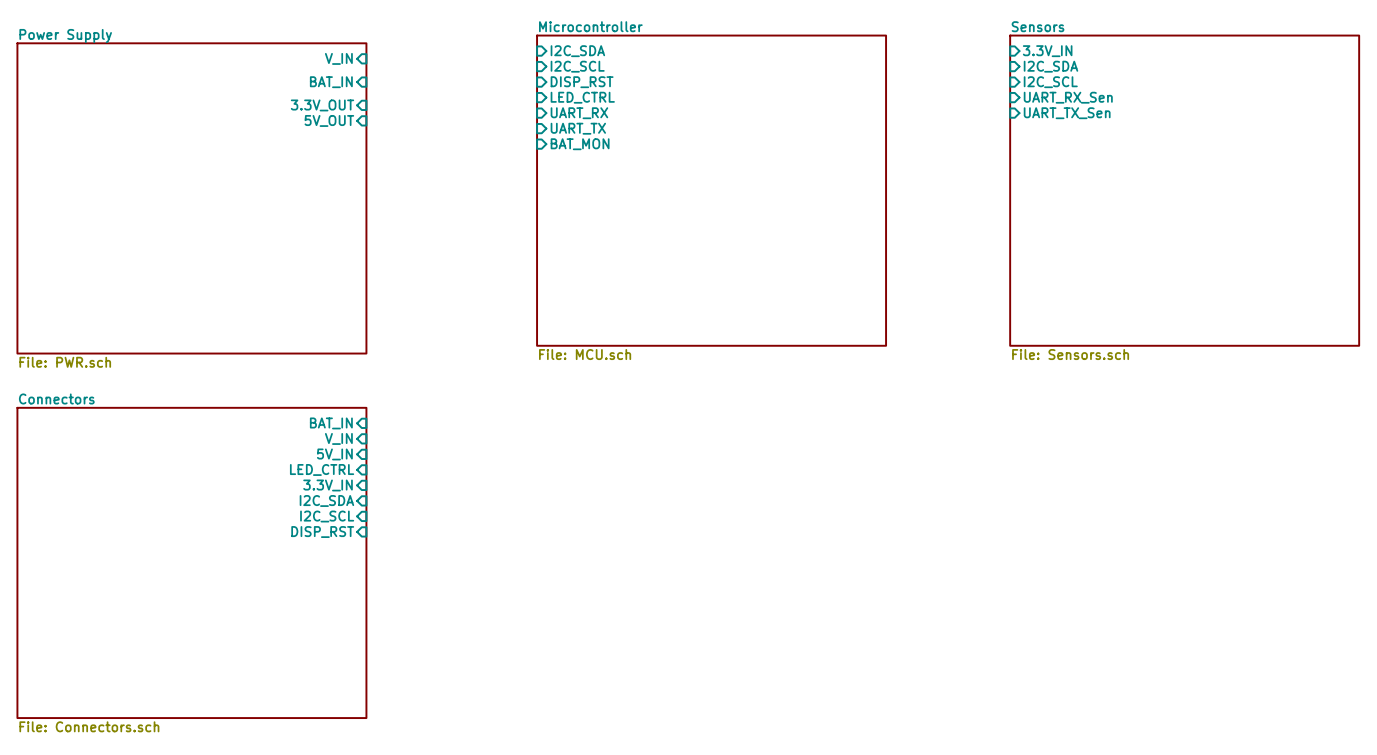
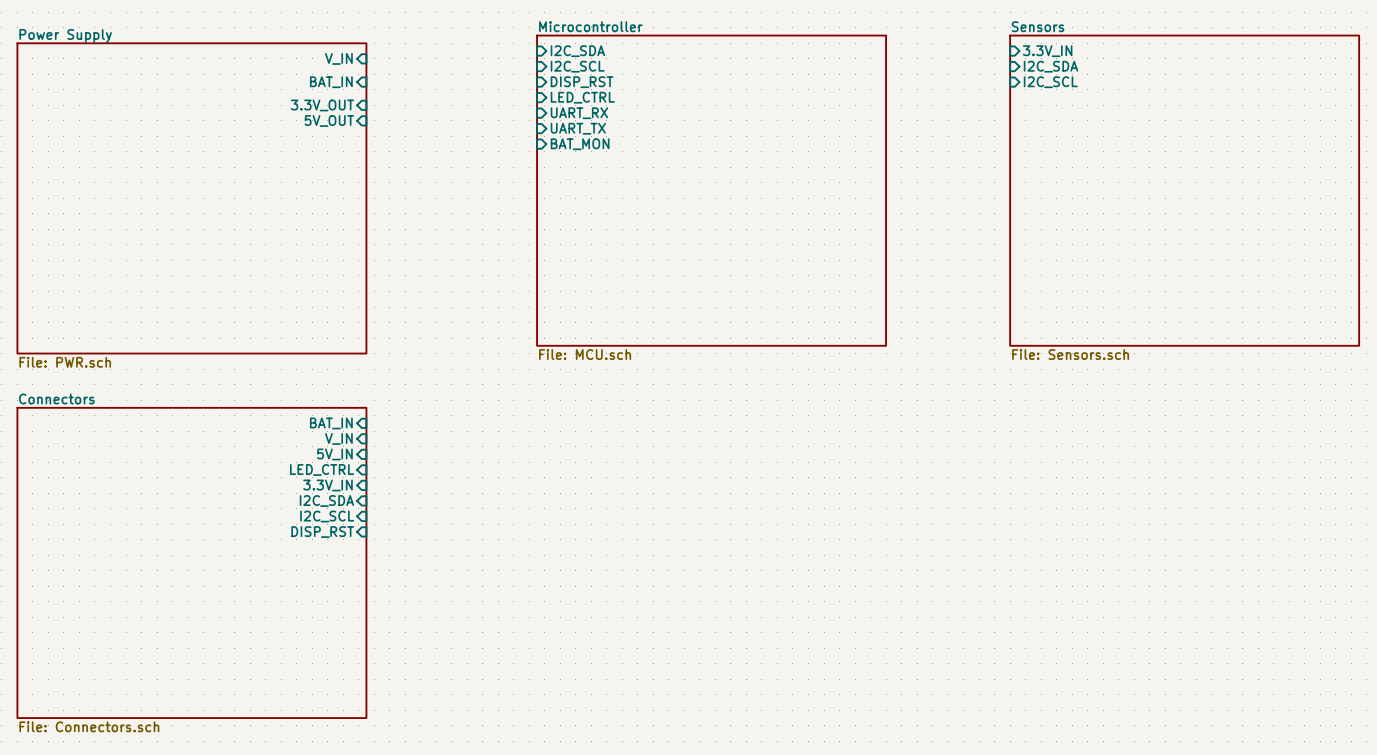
sheet pin: UART_RX_Sen (1068, 97) -> none
sheet pin: UART_TX_Sen (1067, 113) -> none

